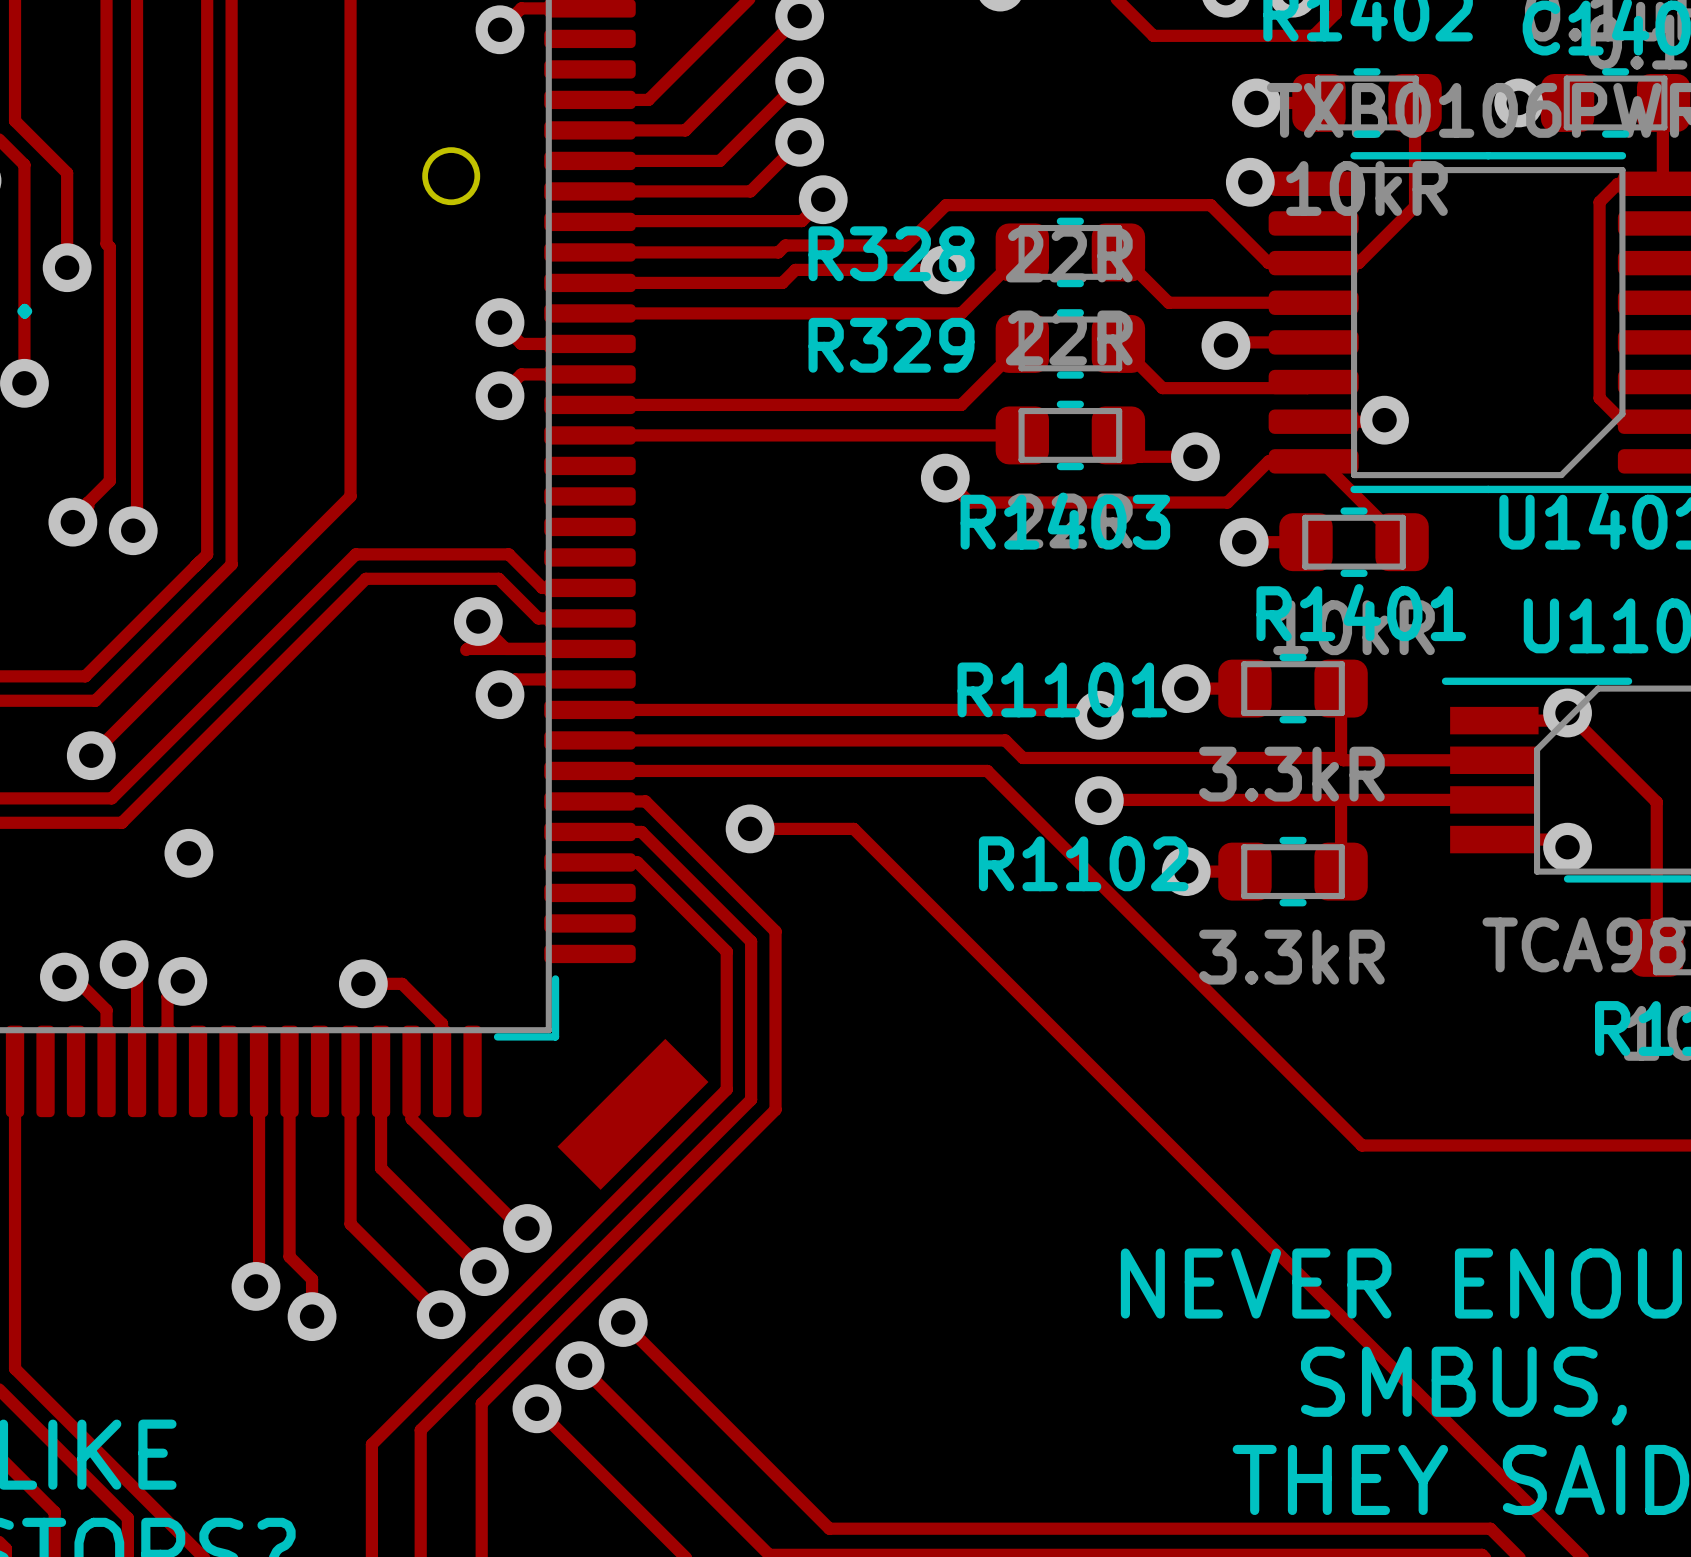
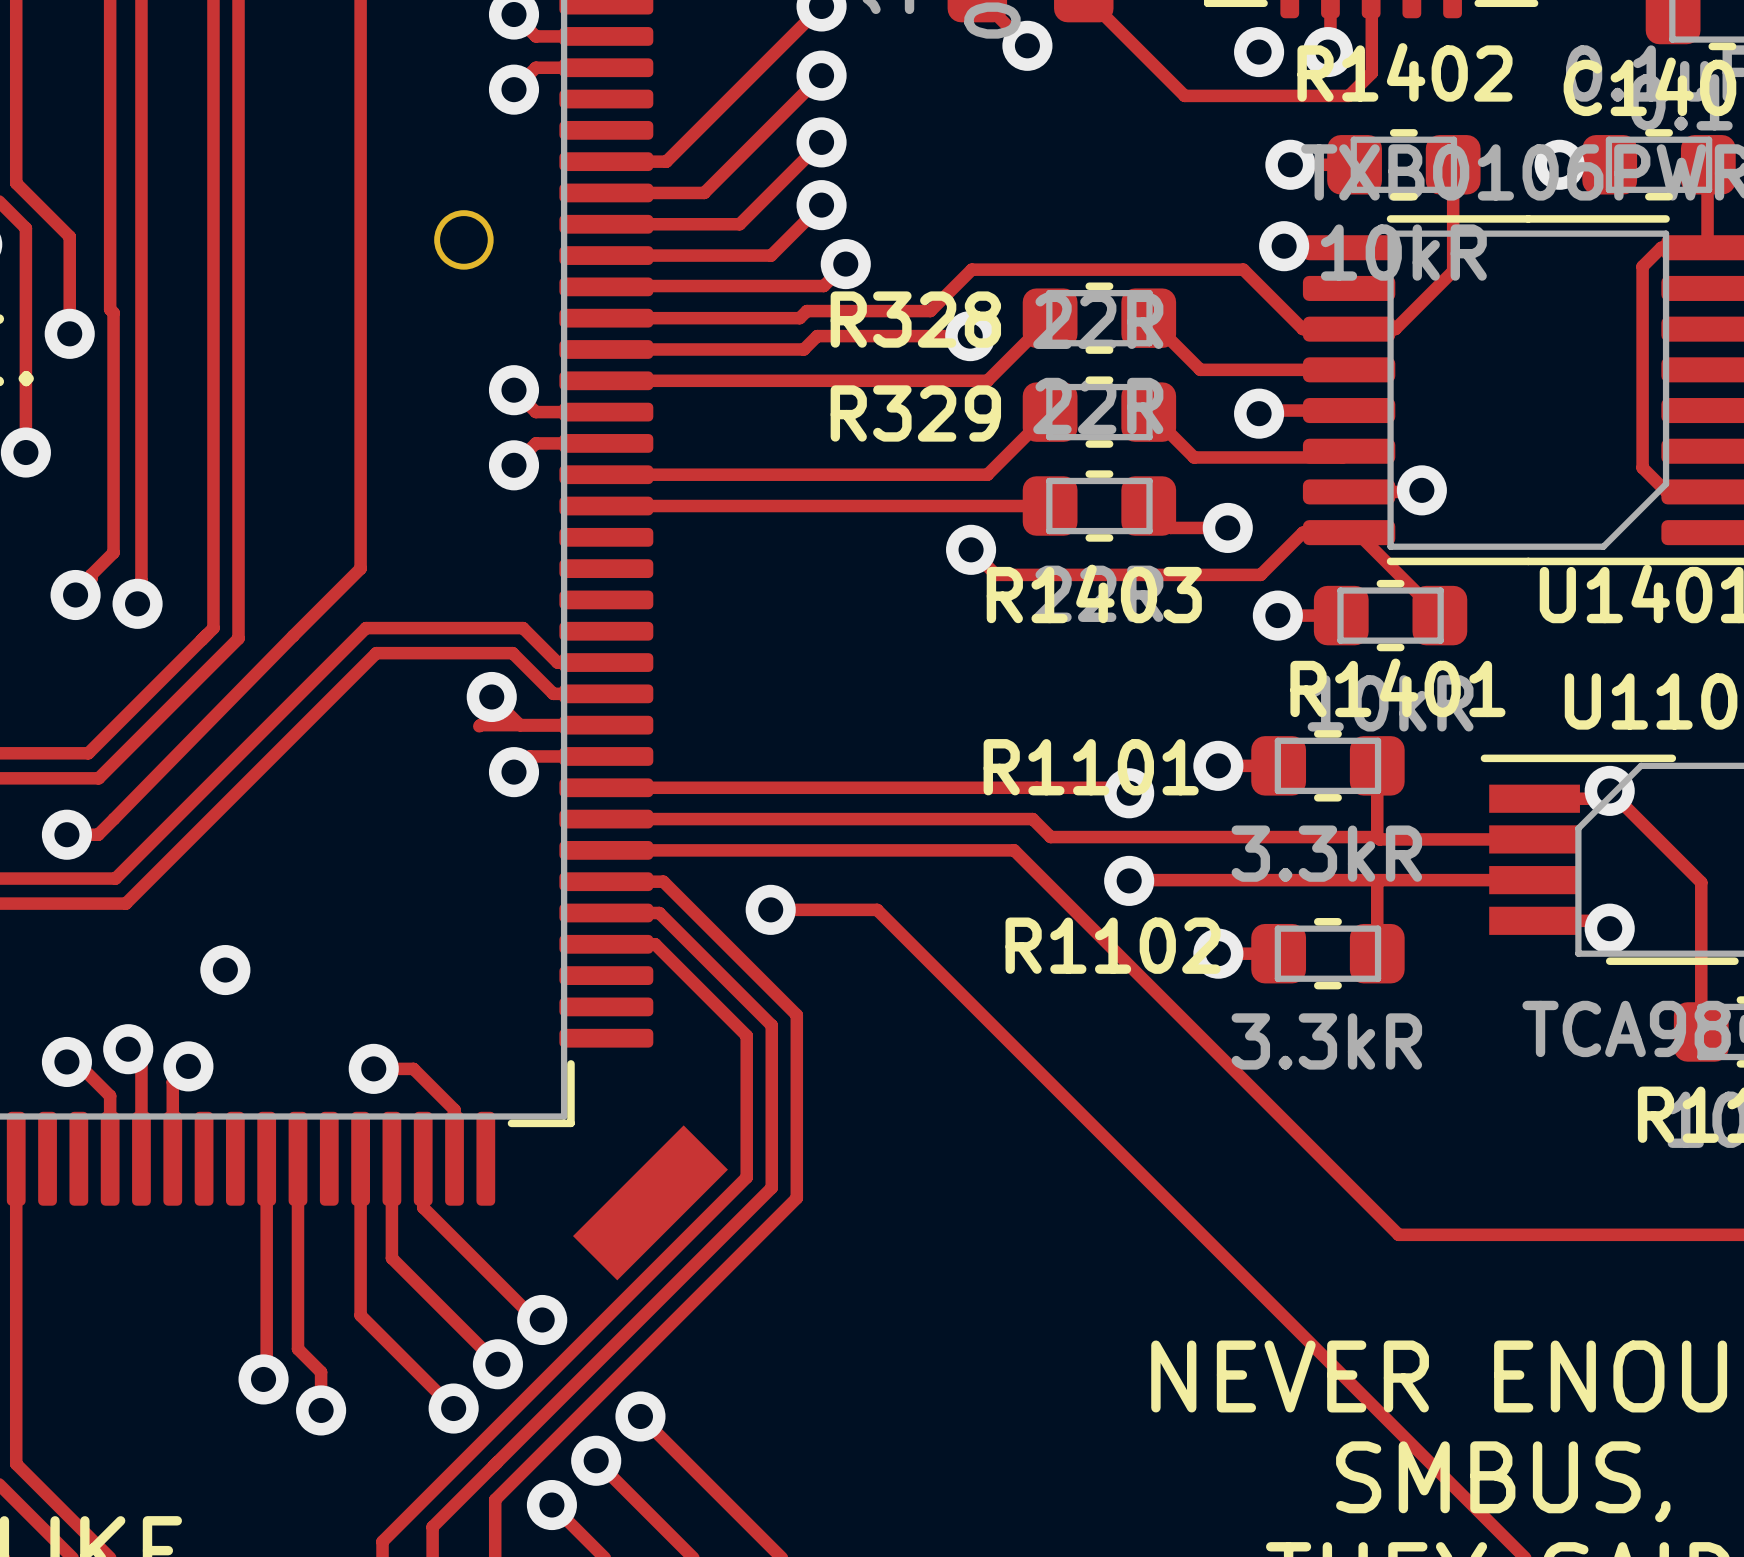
track: (284, 562) (81, 765) -> (293, 635) (98, 834) (66, 834)
via position: (91, 755) -> (66, 834)
via position: (188, 853) -> (225, 970)

